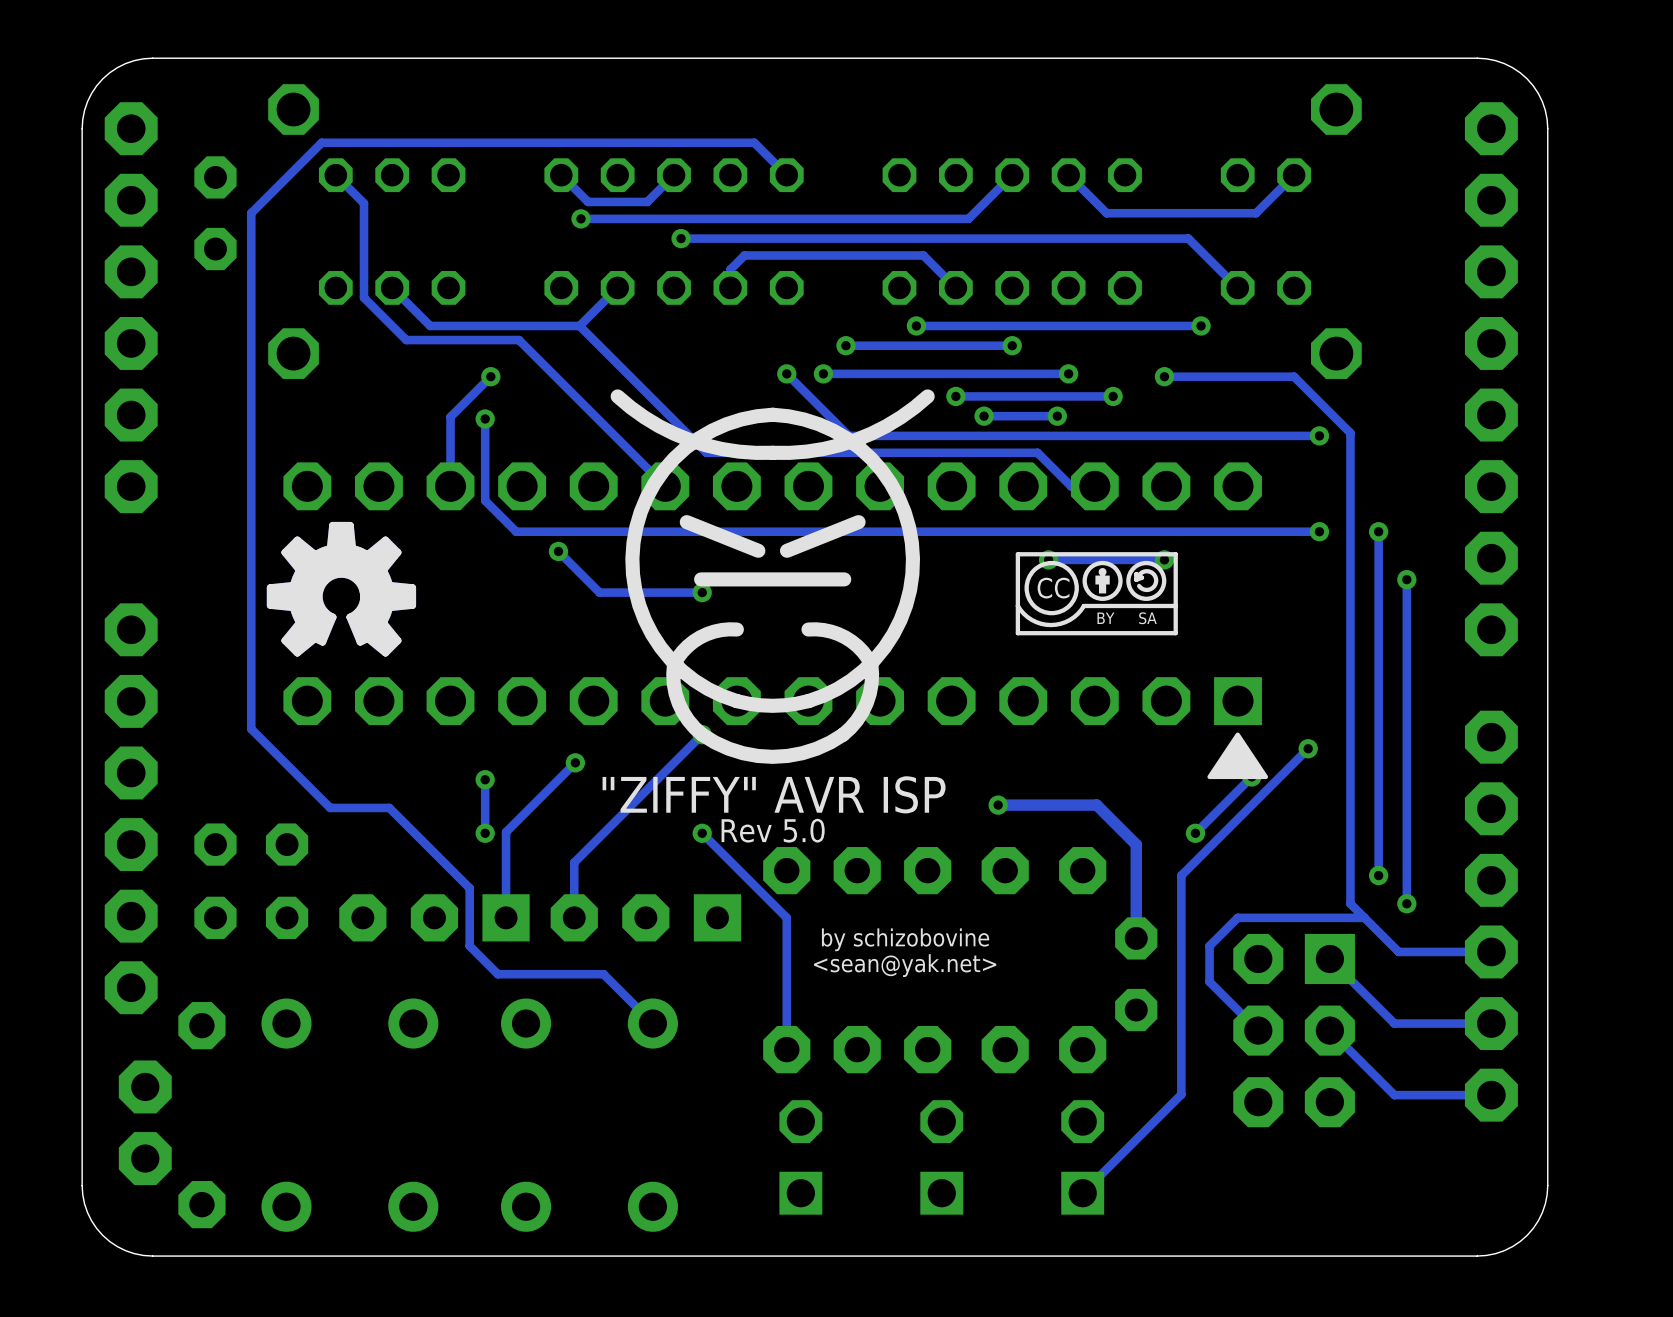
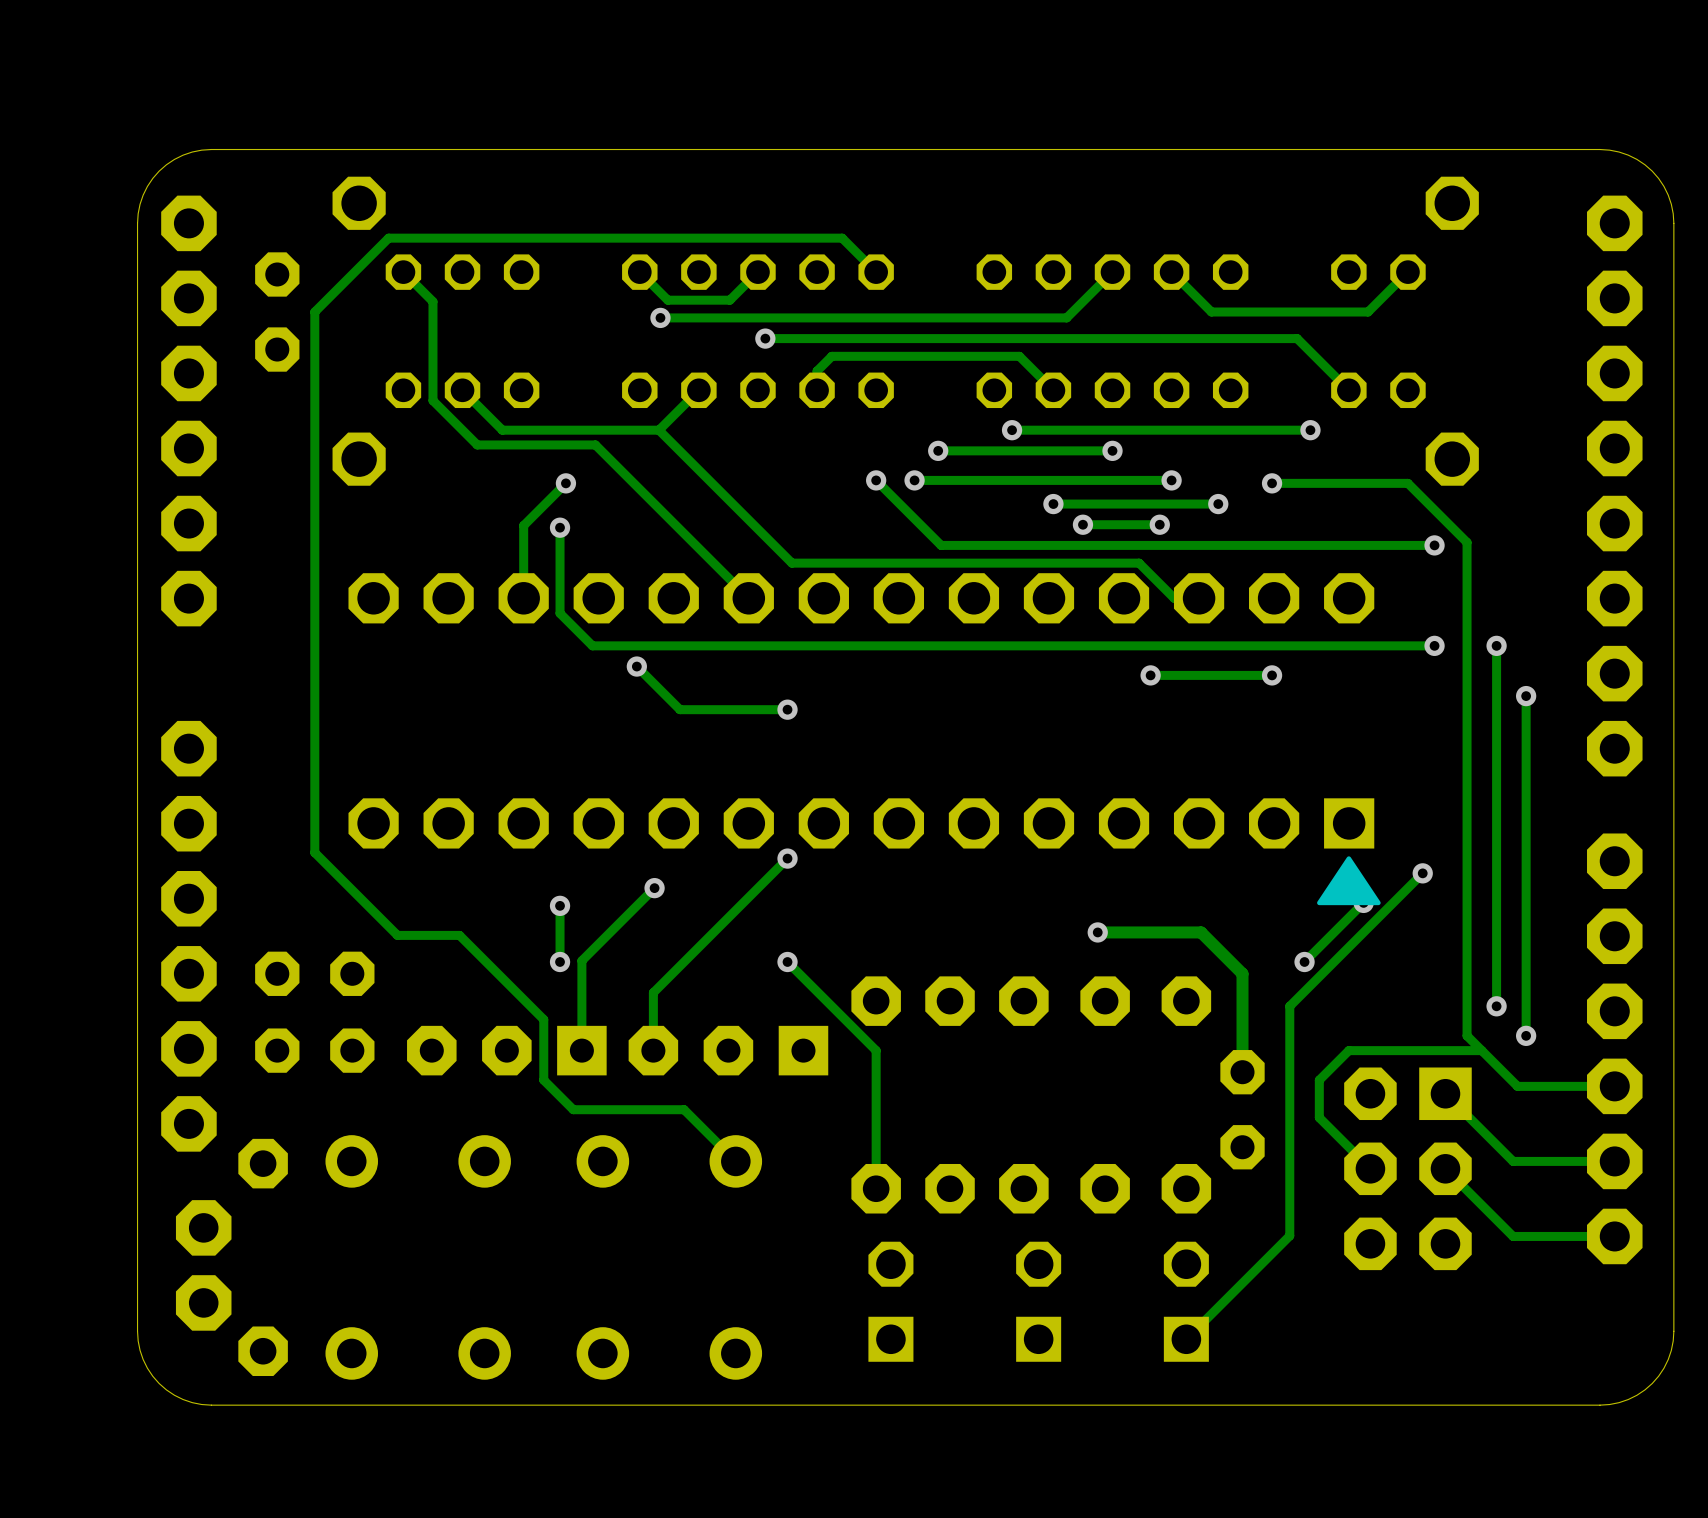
drawing: [610, 389, 935, 764] -> none
drawing: [266, 521, 417, 657] -> none
drawing: [1015, 552, 1178, 636] -> none
text: "ZIFFY" AVR ISP (774, 794) -> none
text: Rev 5.0 (773, 830) -> none
text: by schizobovine (905, 939) -> none
text: <sean@yak.net> (905, 965) -> none

